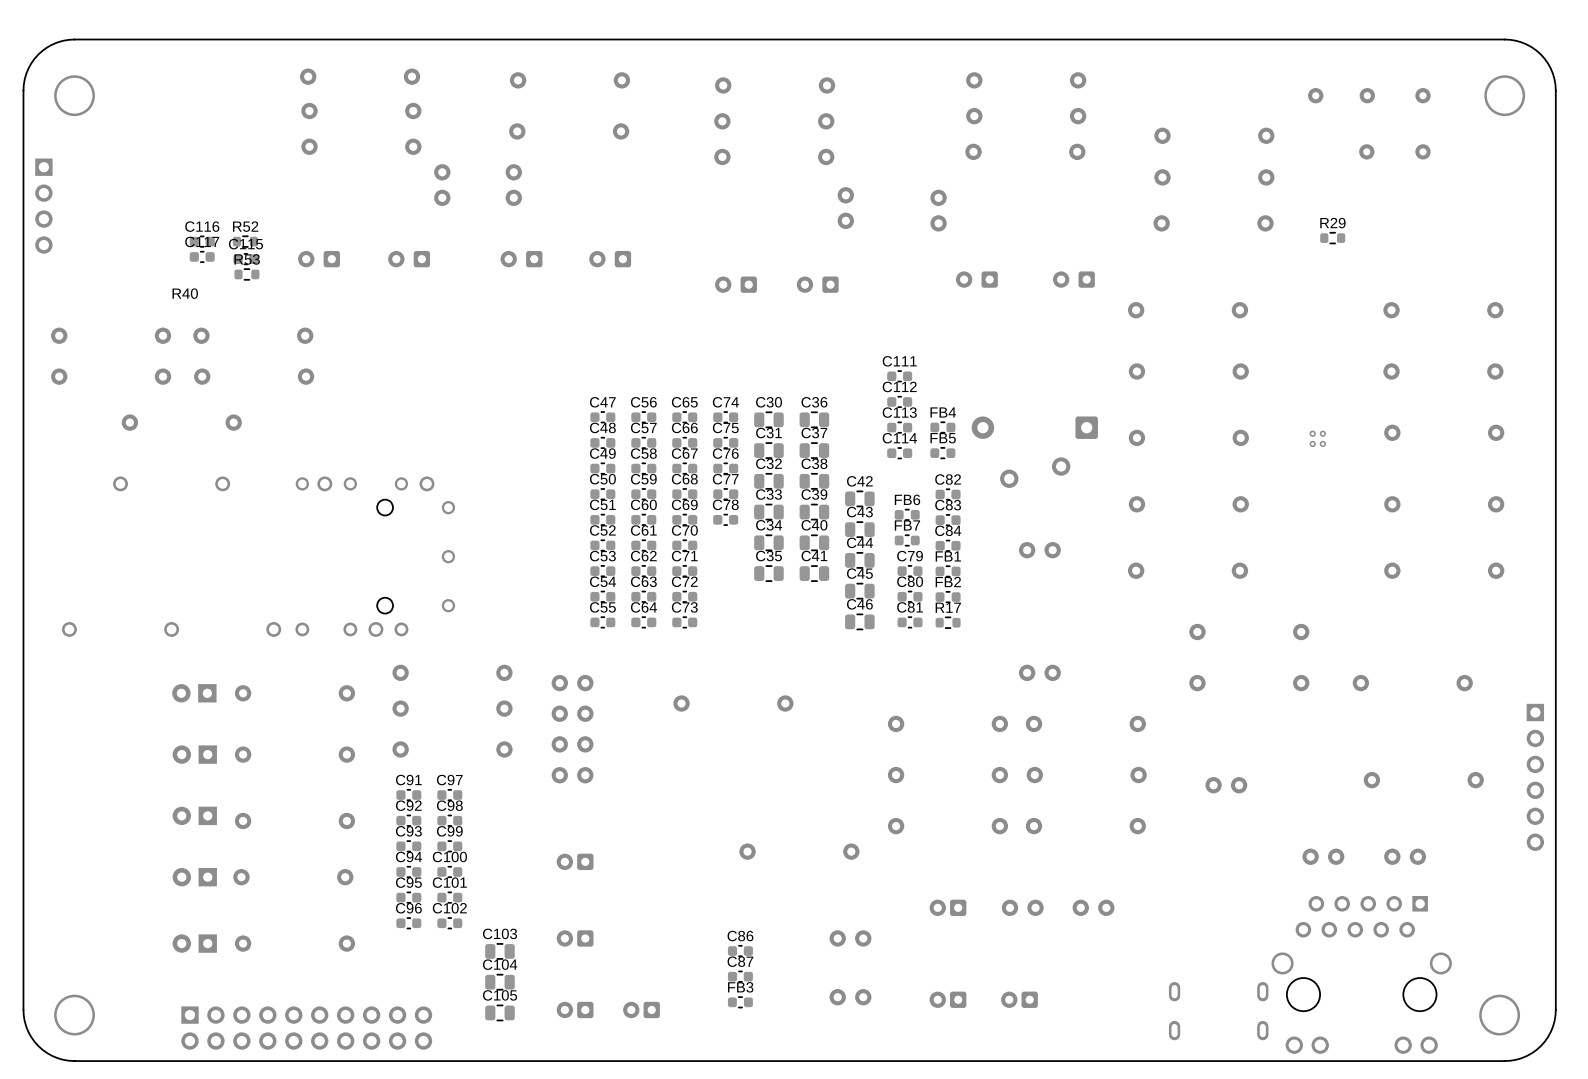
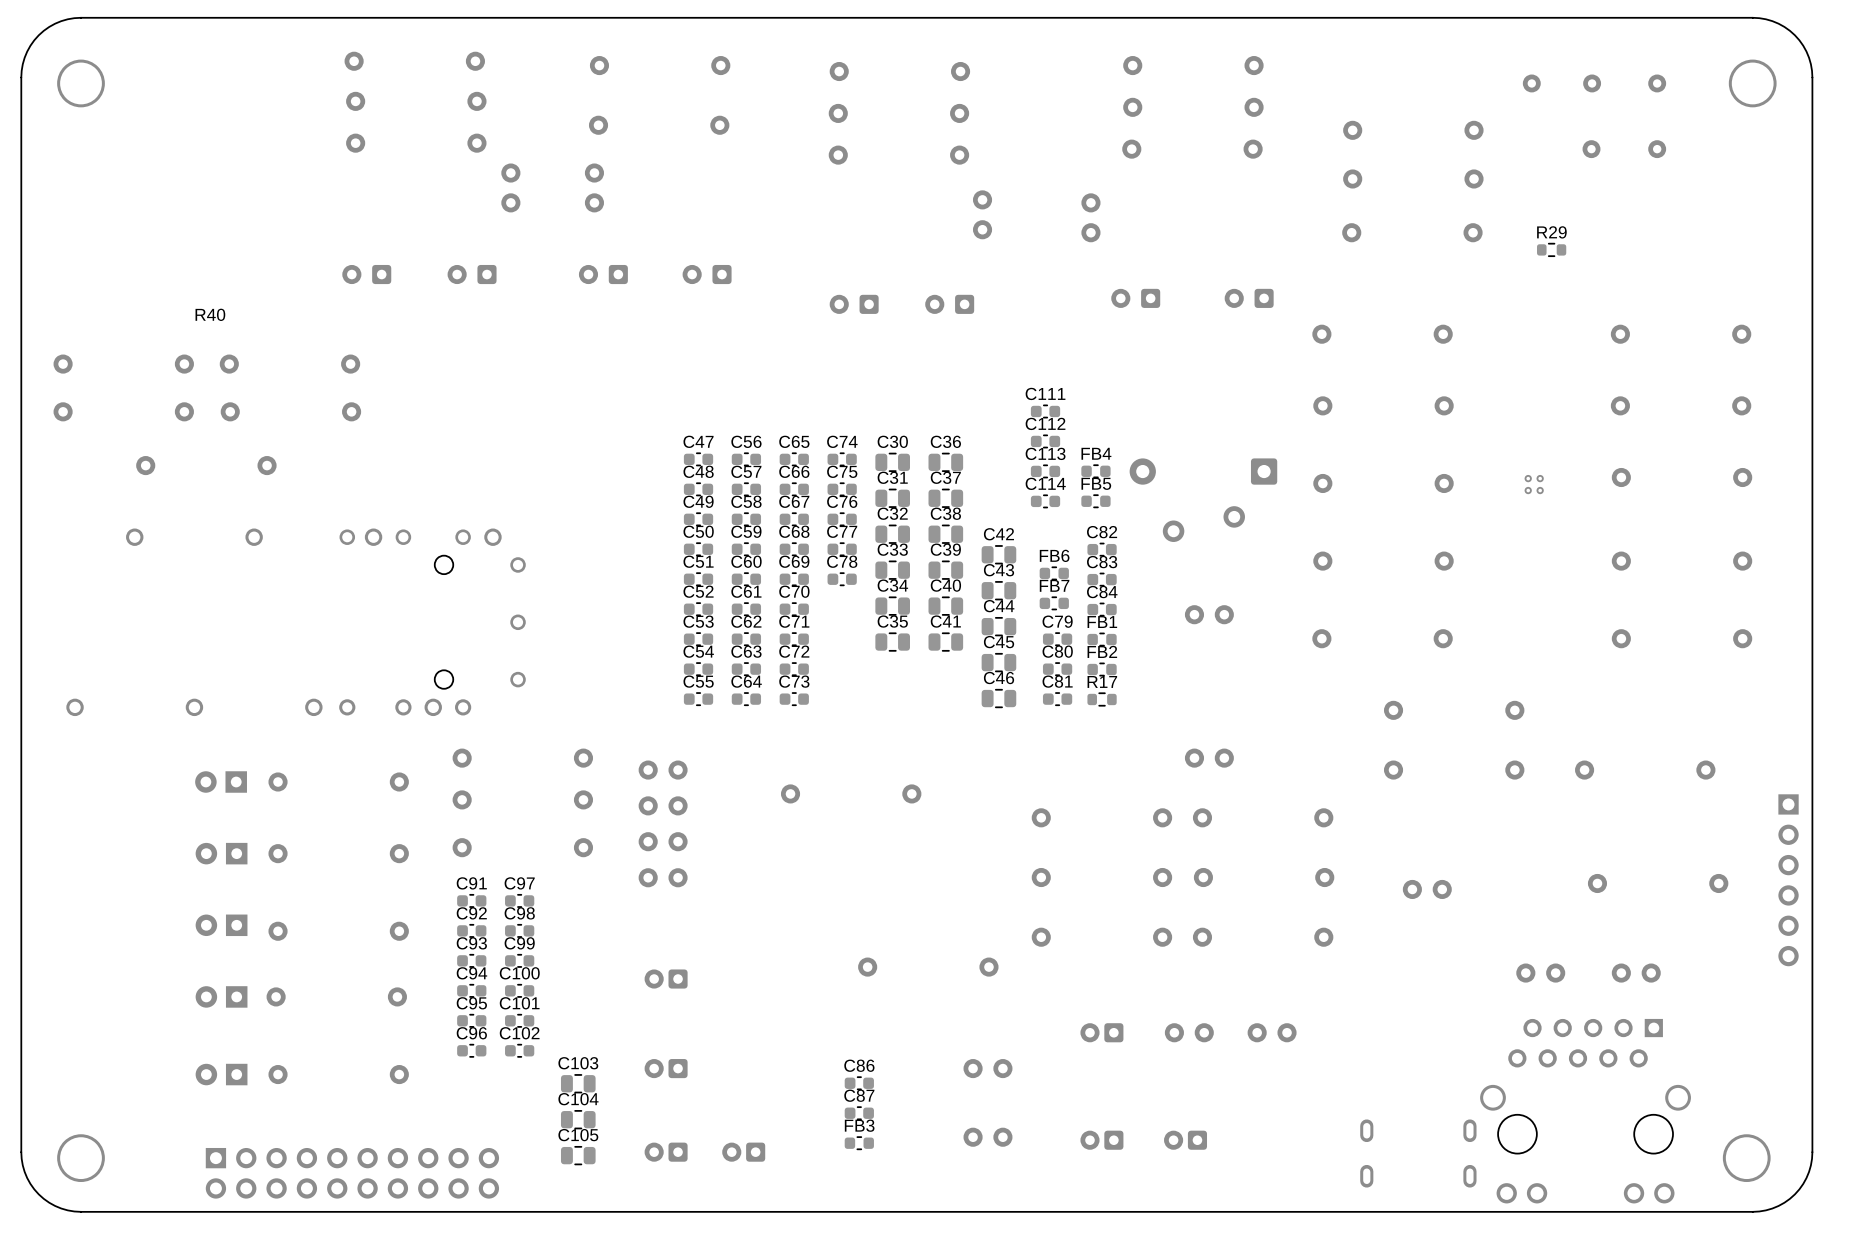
part: (43, 206) -> none
C116: (202, 241) -> none
R52: (245, 241) -> none
C117: (202, 256) -> none
C115: (245, 259) -> none
R53: (246, 274) -> none

